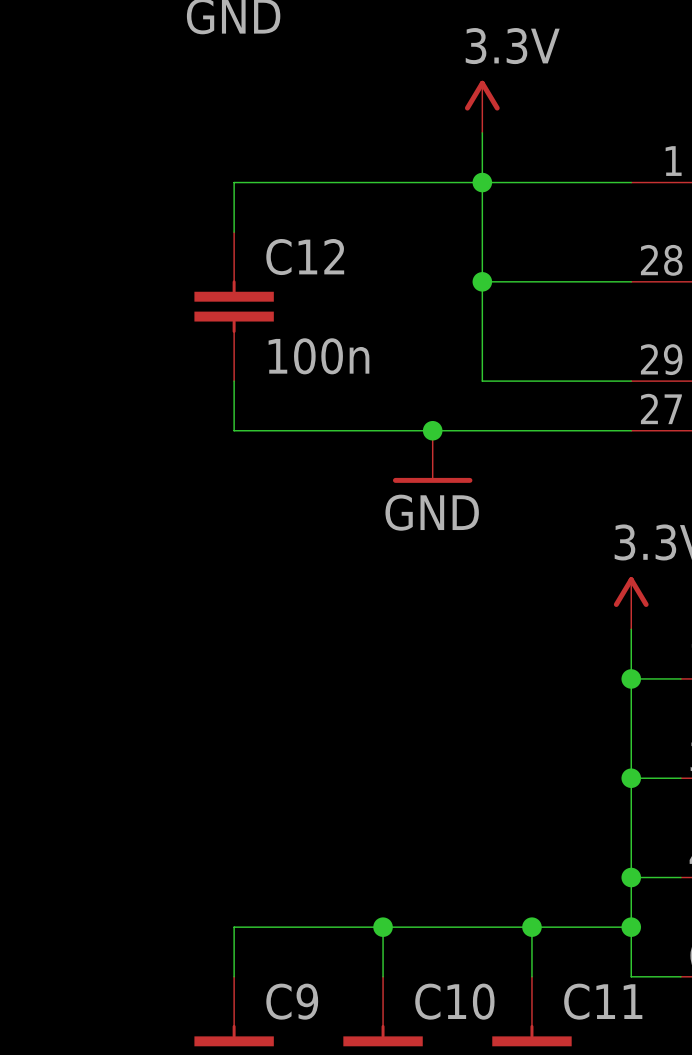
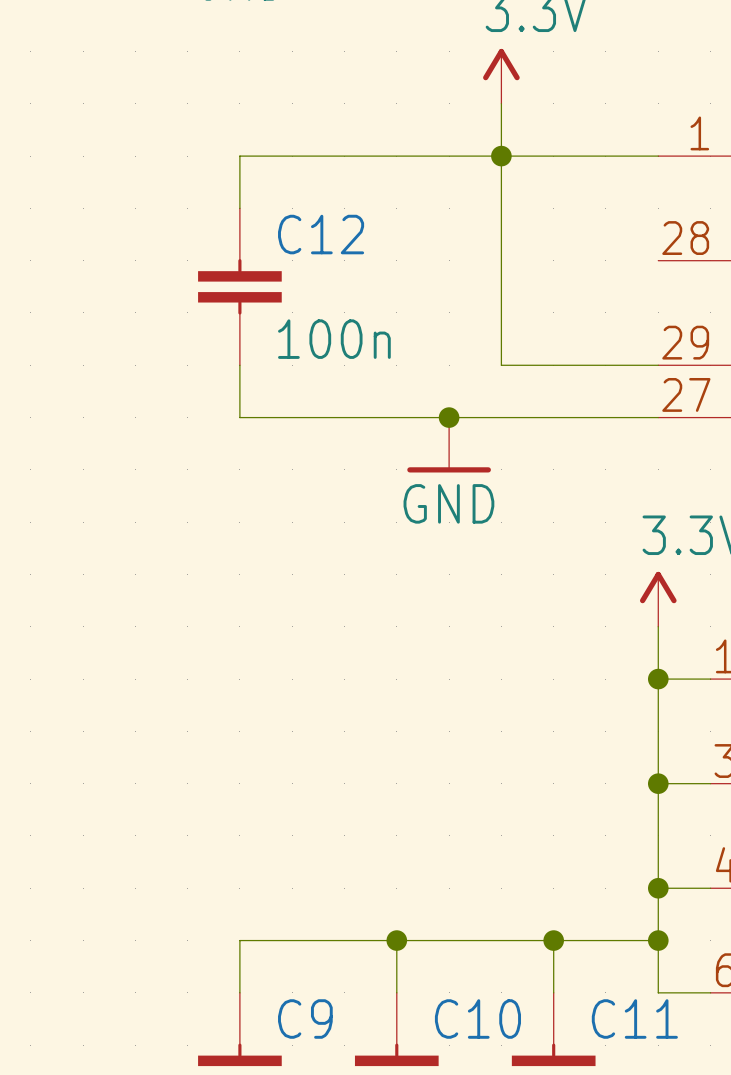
wire: (482, 281) (631, 281) -> none
junction: (482, 281) -> none

